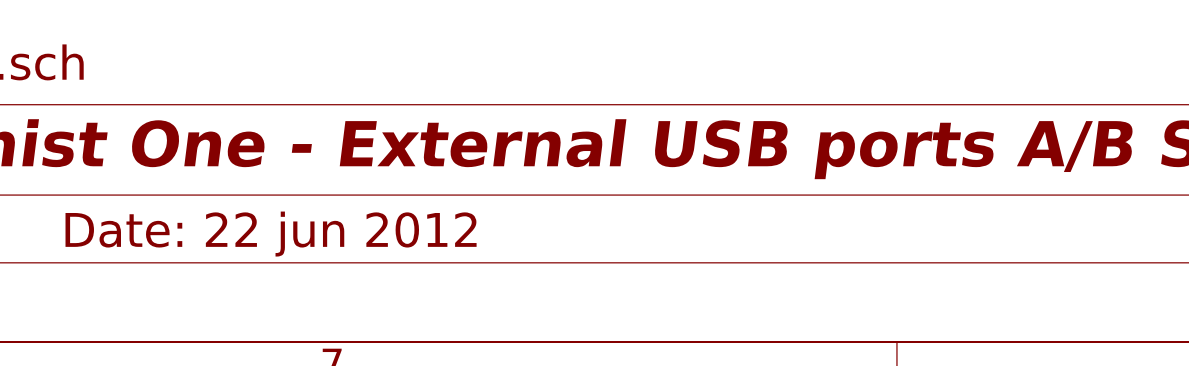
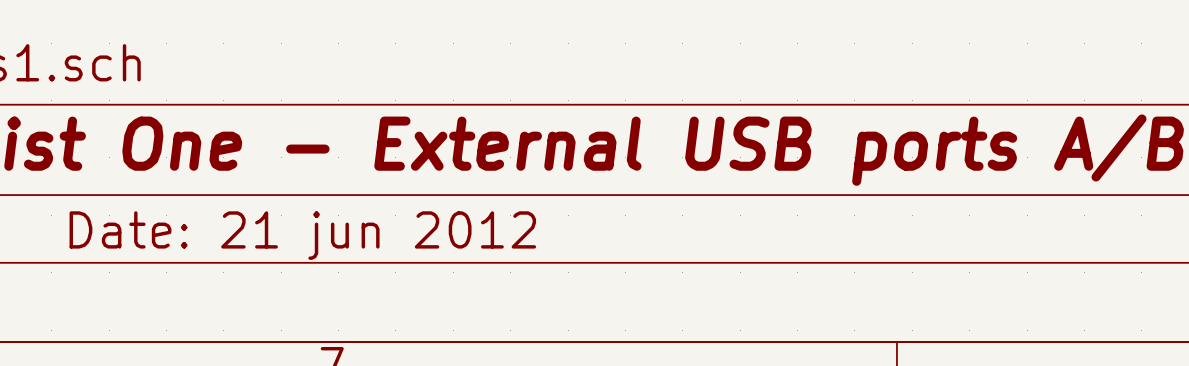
title block: Date: 22 jun 2012 (271, 234) -> Date: 21 jun 2012 (302, 235)

